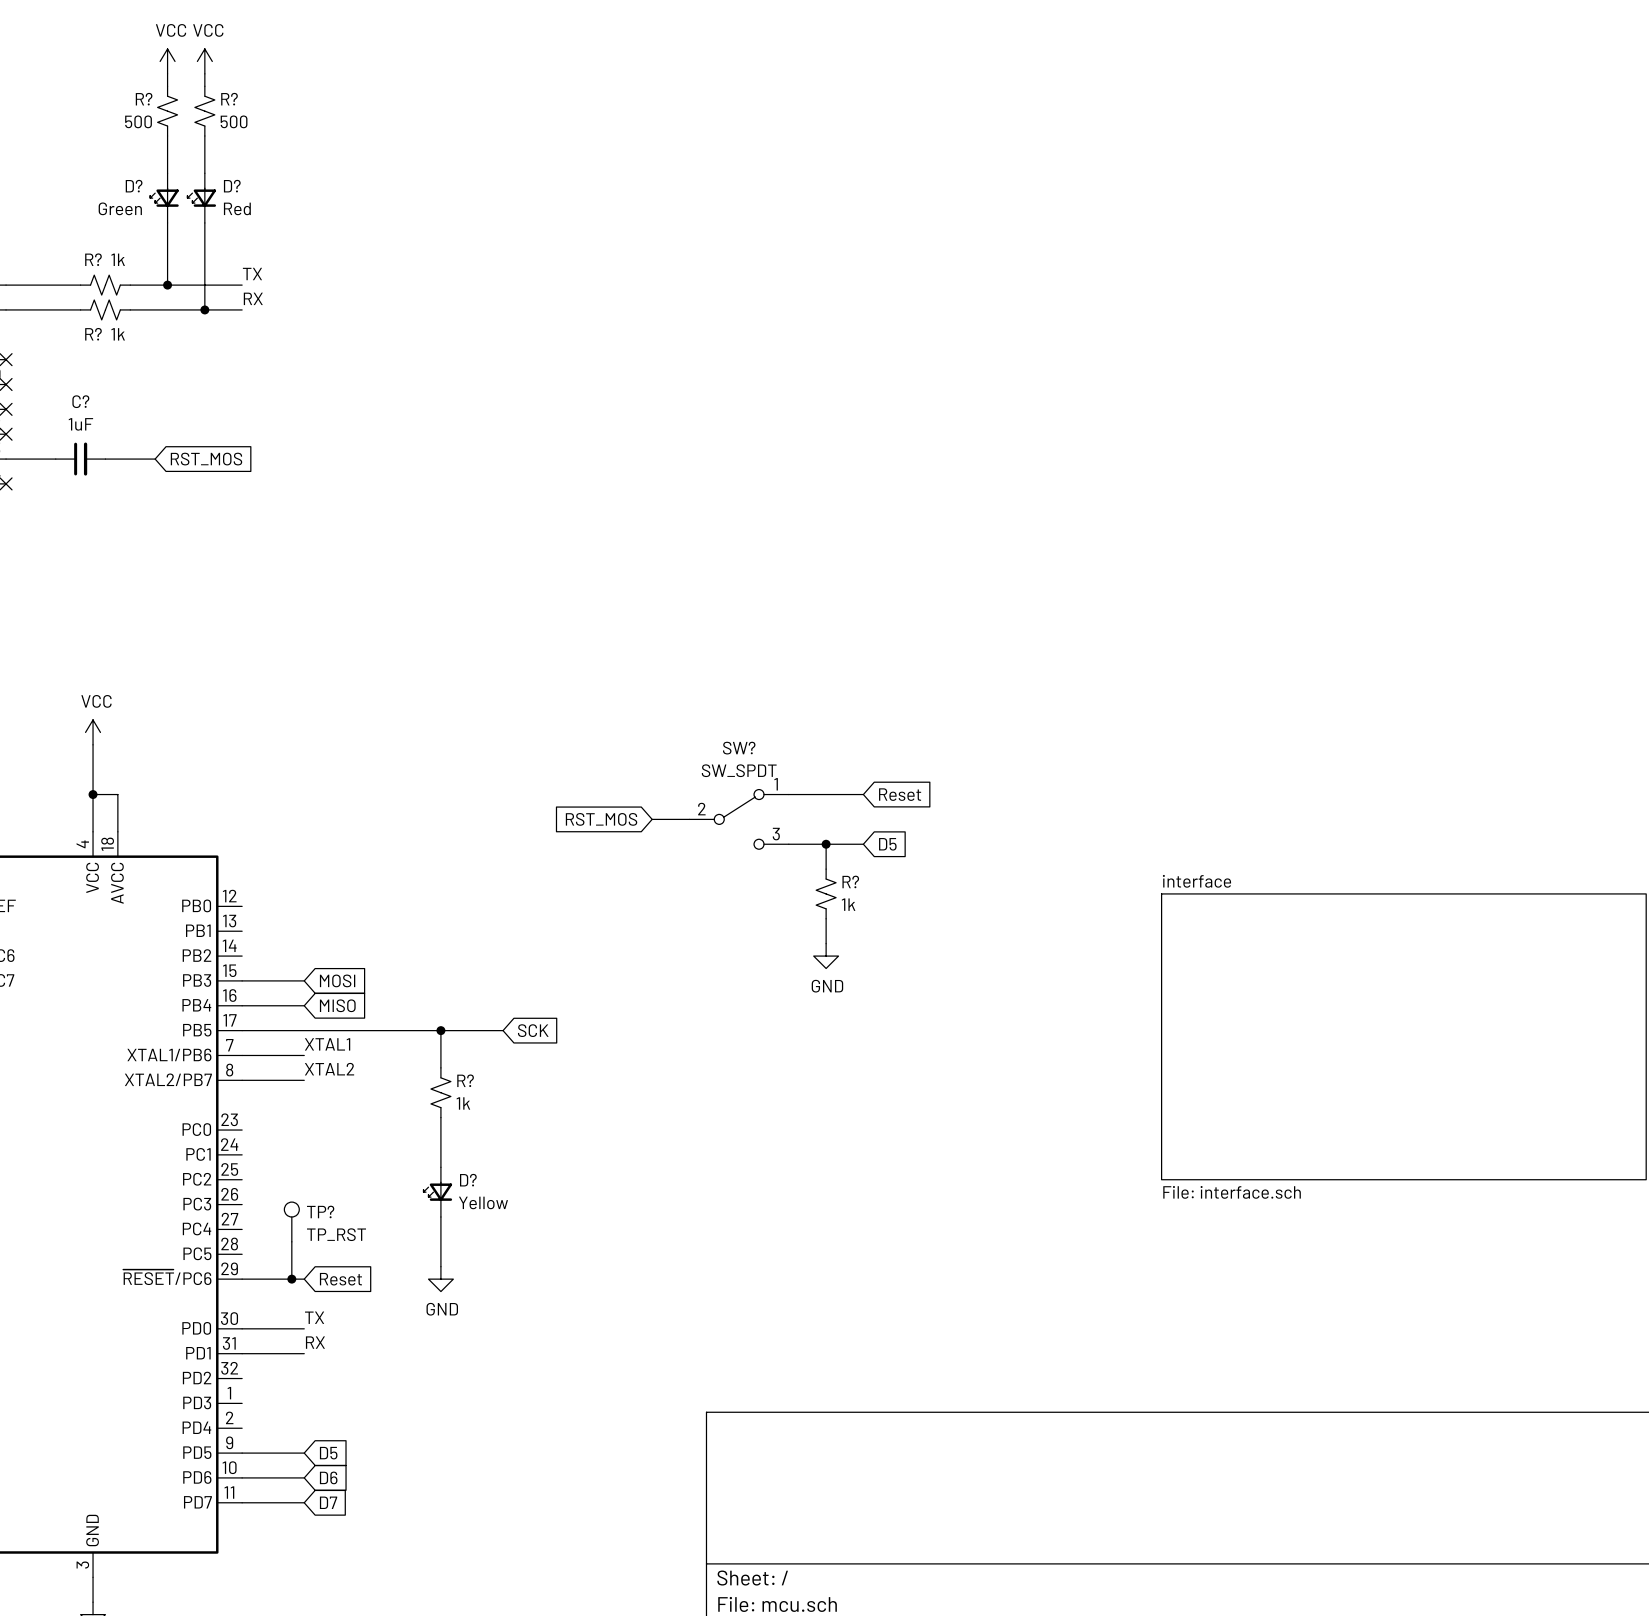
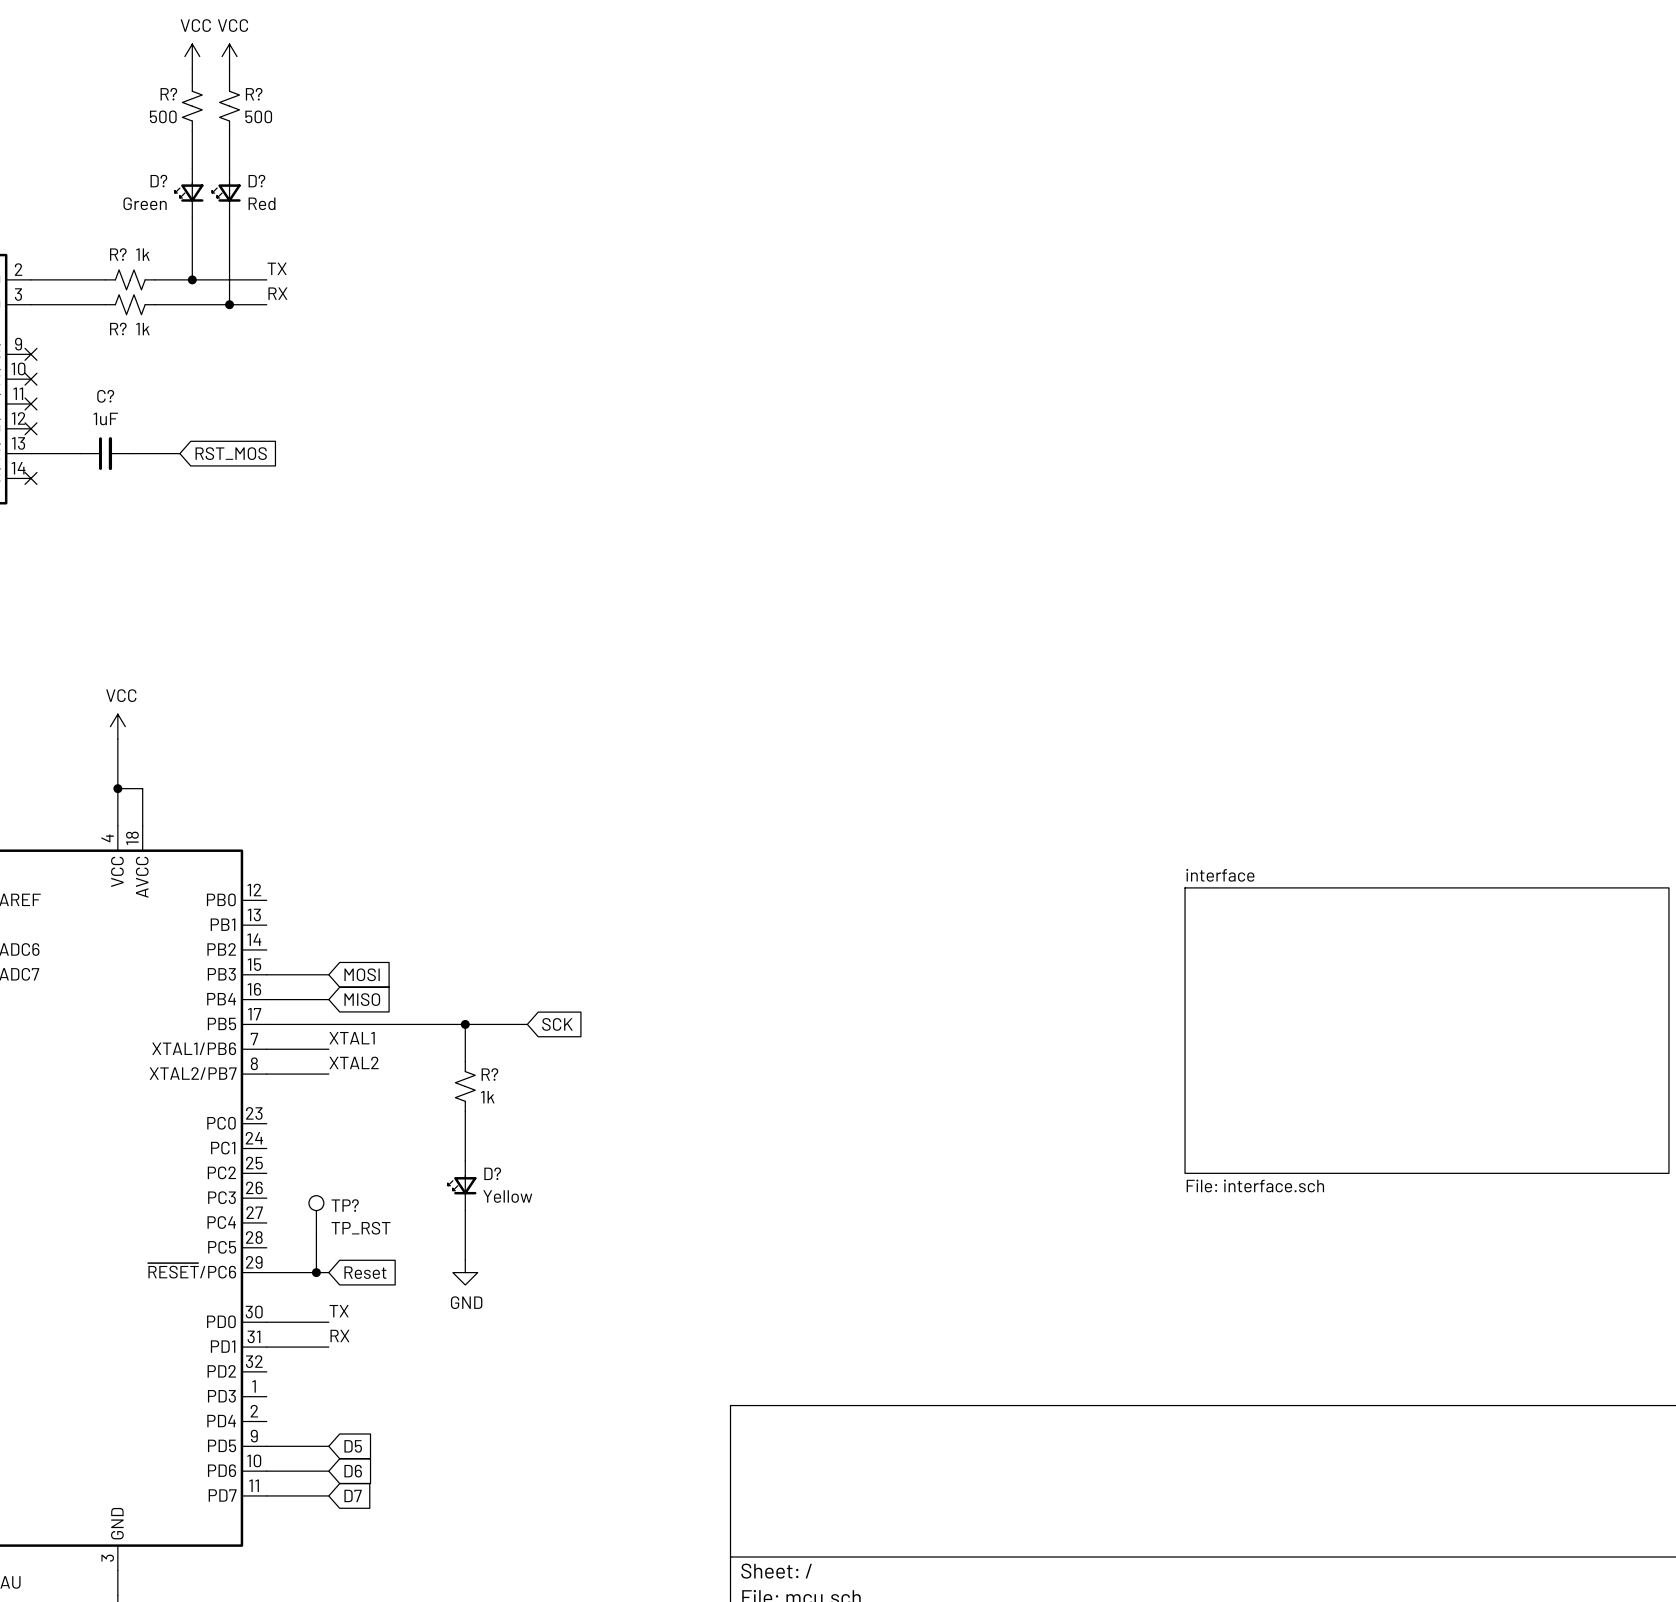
wire: (788, 794) (863, 794) -> none
global label: Reset (900, 794) -> none
global label: RST_MOS (601, 819) -> none
wire: (652, 819) (689, 819) -> none
SW?: SW_SPDT (739, 819) -> none
wire: (788, 844) (863, 844) -> none
wire: (826, 844) (826, 869) -> none
junction: (826, 844) -> none
global label: D5 (887, 844) -> none
R?: 1k (826, 893) -> none
wire: (826, 918) (826, 943) -> none
power symbol: GND (826, 956) -> none

